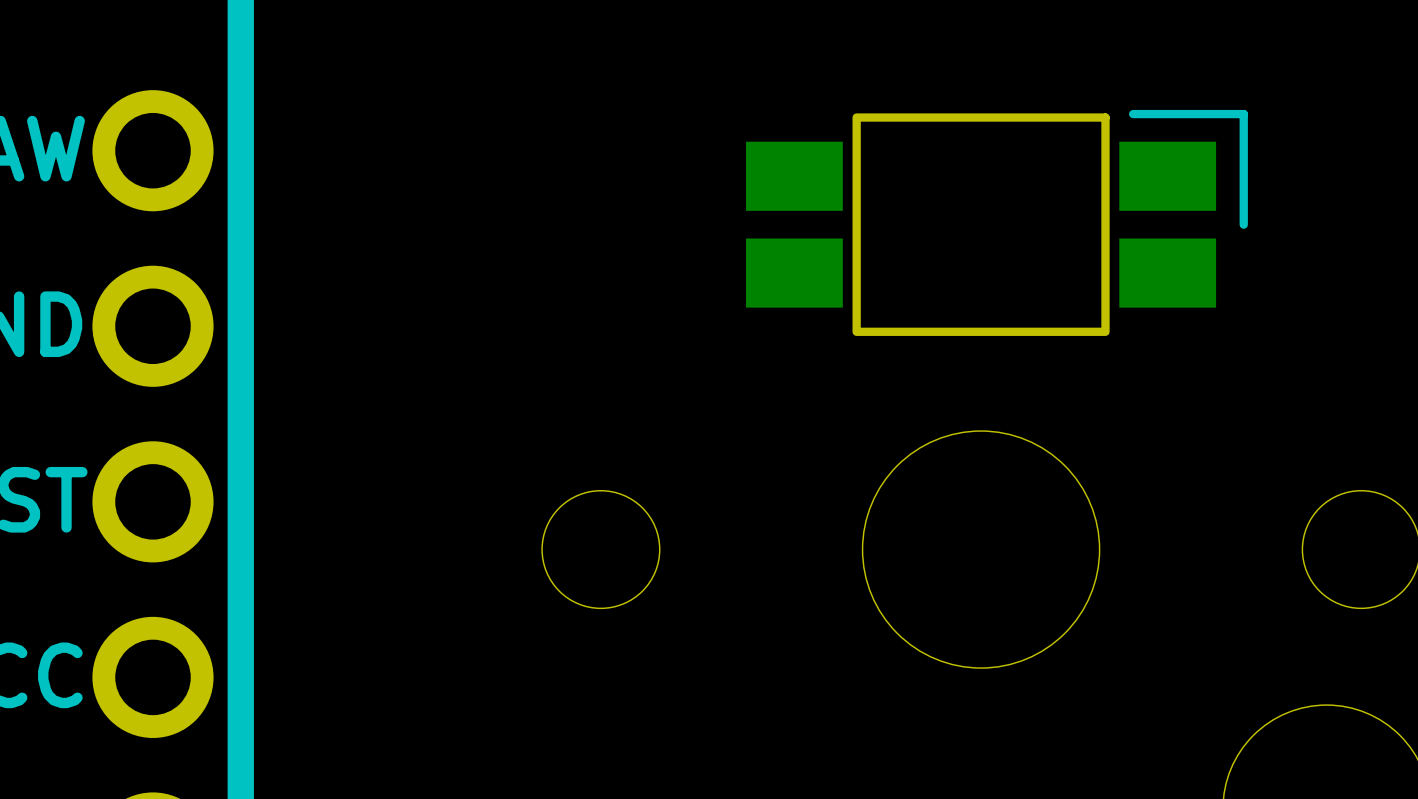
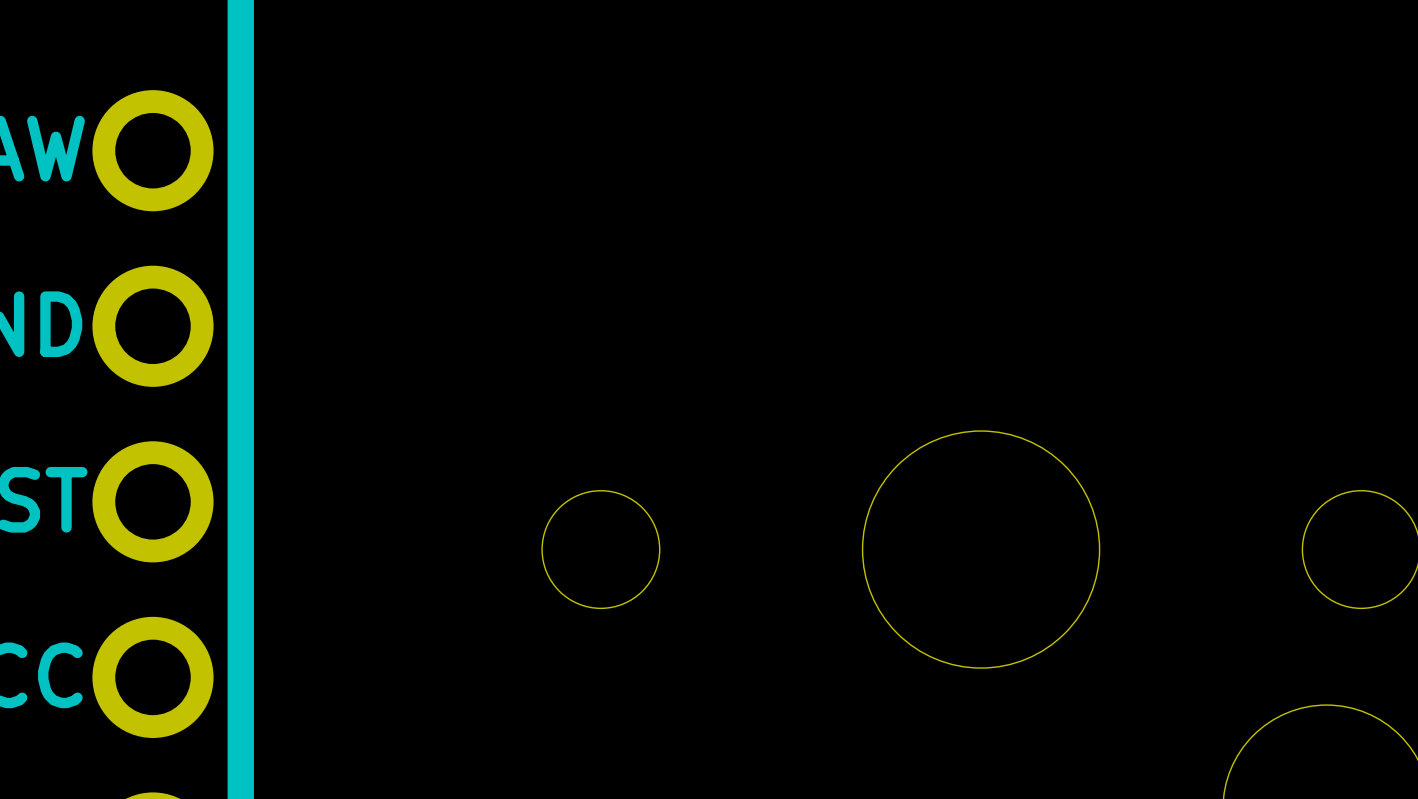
part: (996, 222) -> none

